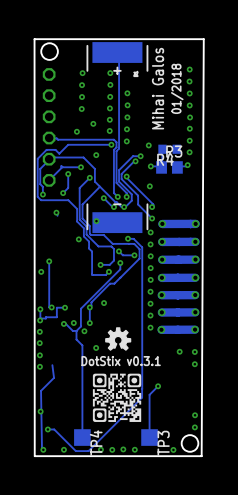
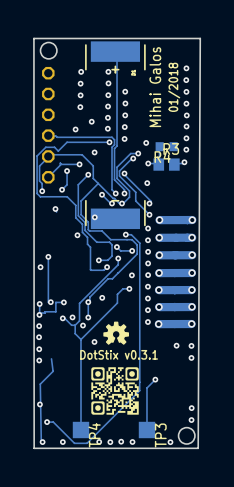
via: none -> (131, 275)
track: none -> (129, 288) (123, 288) (117, 294) (117, 303) (80, 339)
via: none -> (129, 288)

